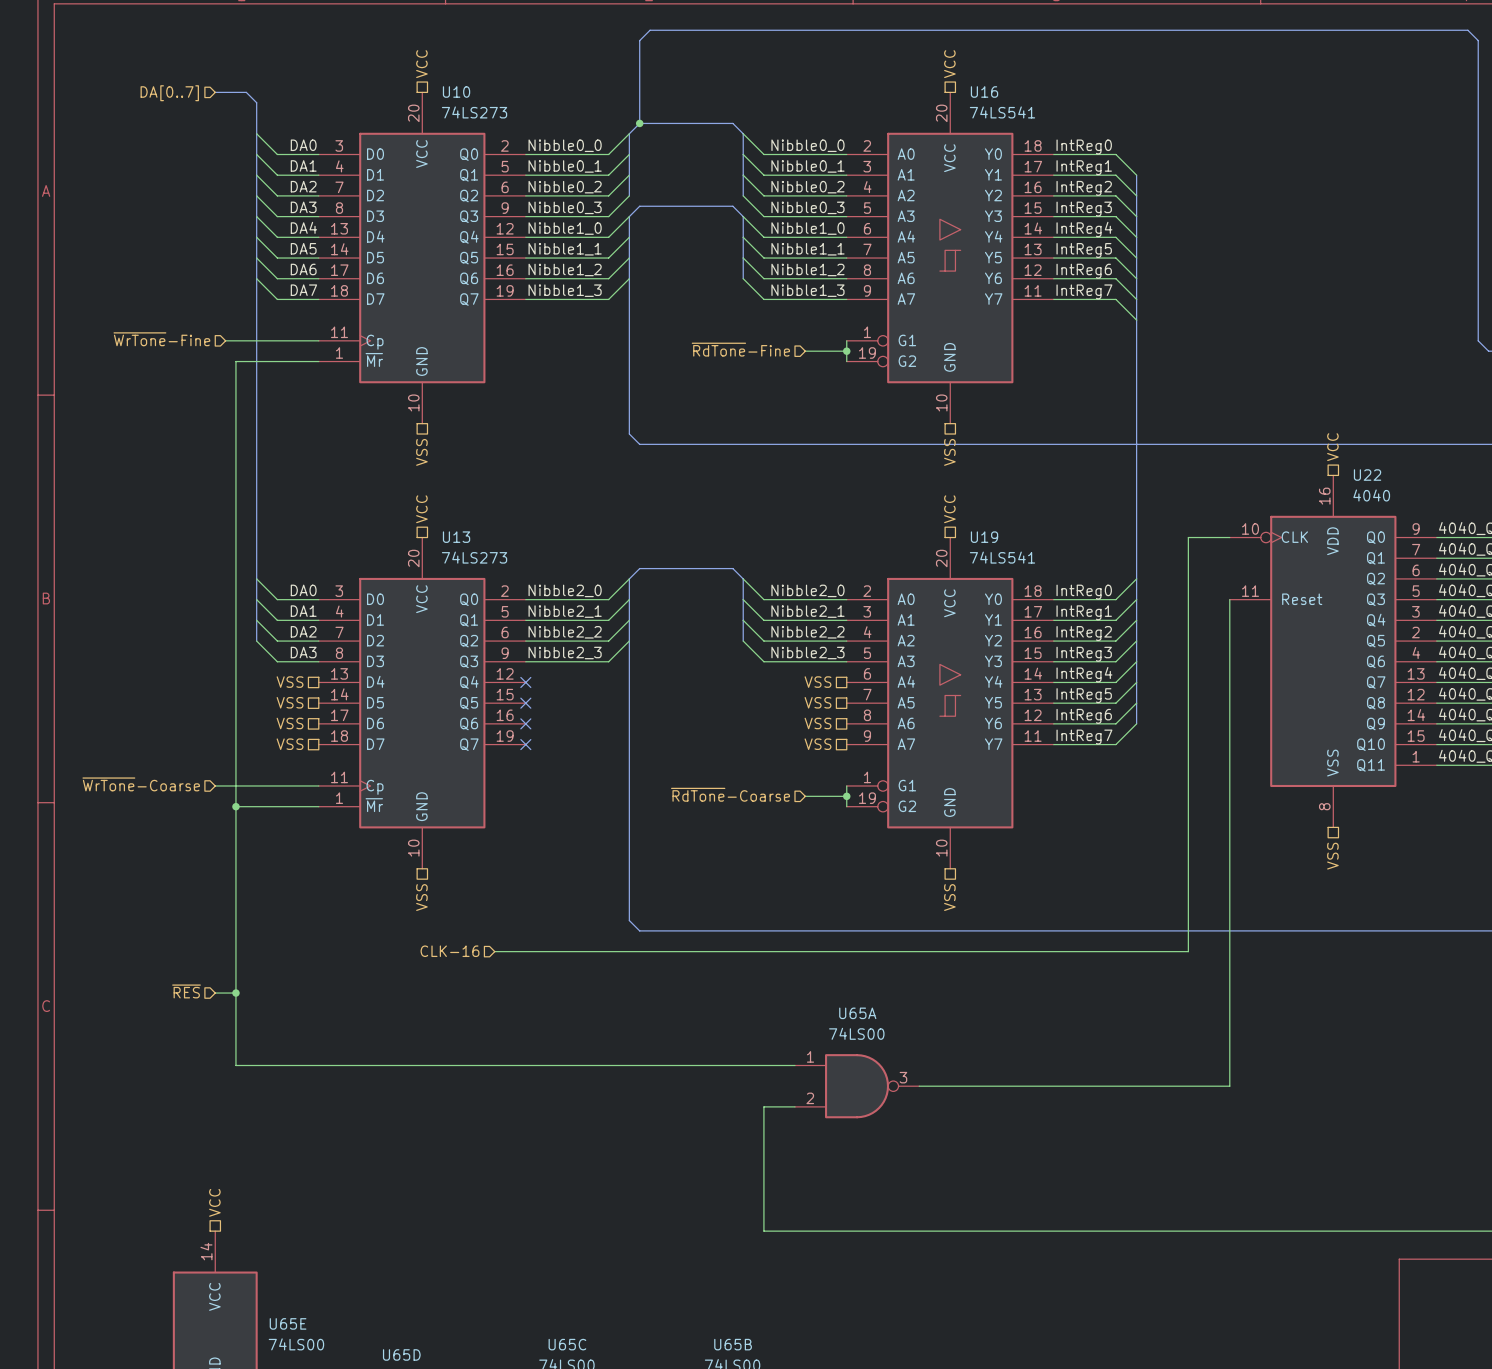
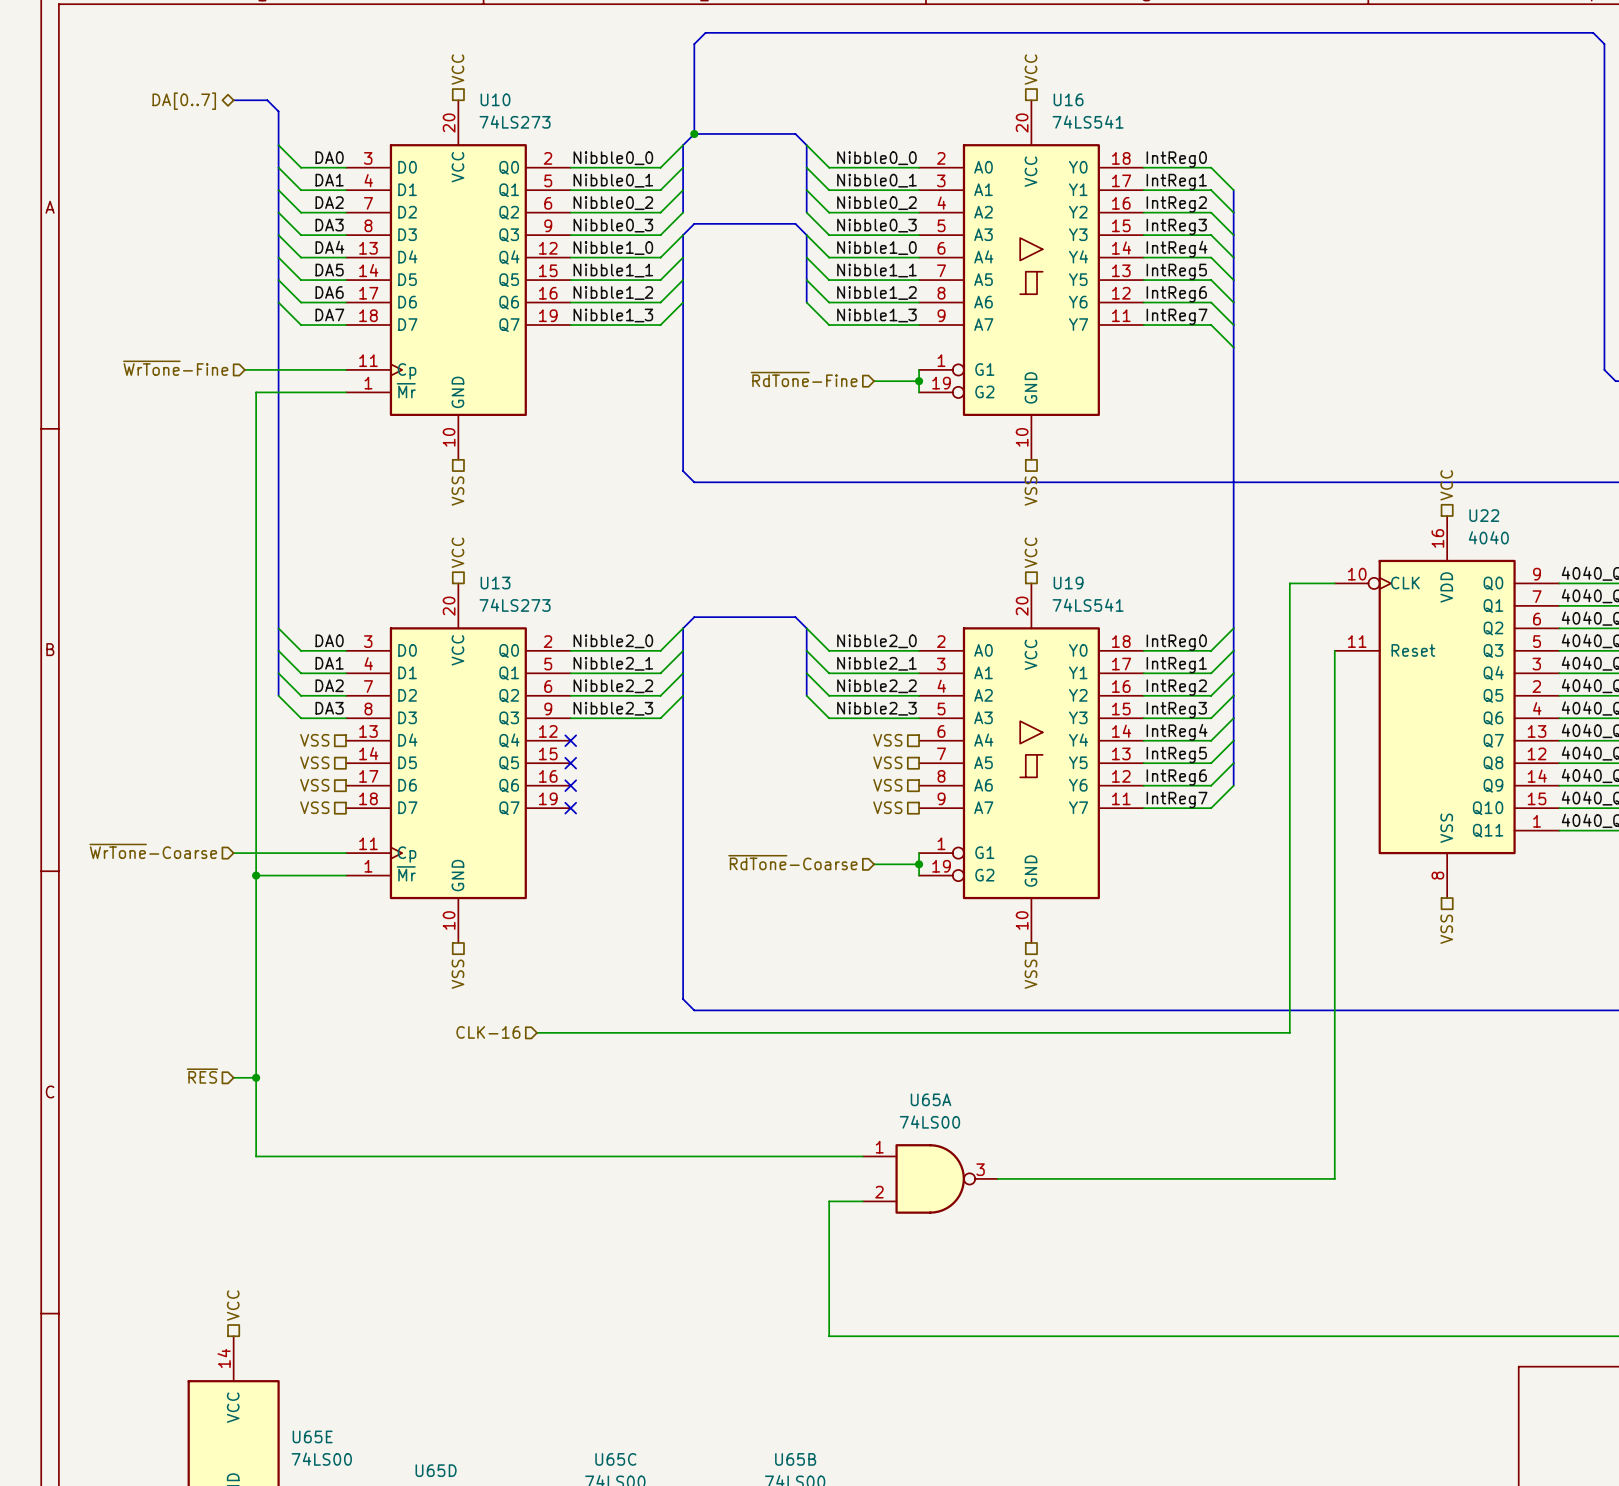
hierarchical label shape: input (169, 93) -> bidirectional (184, 101)

